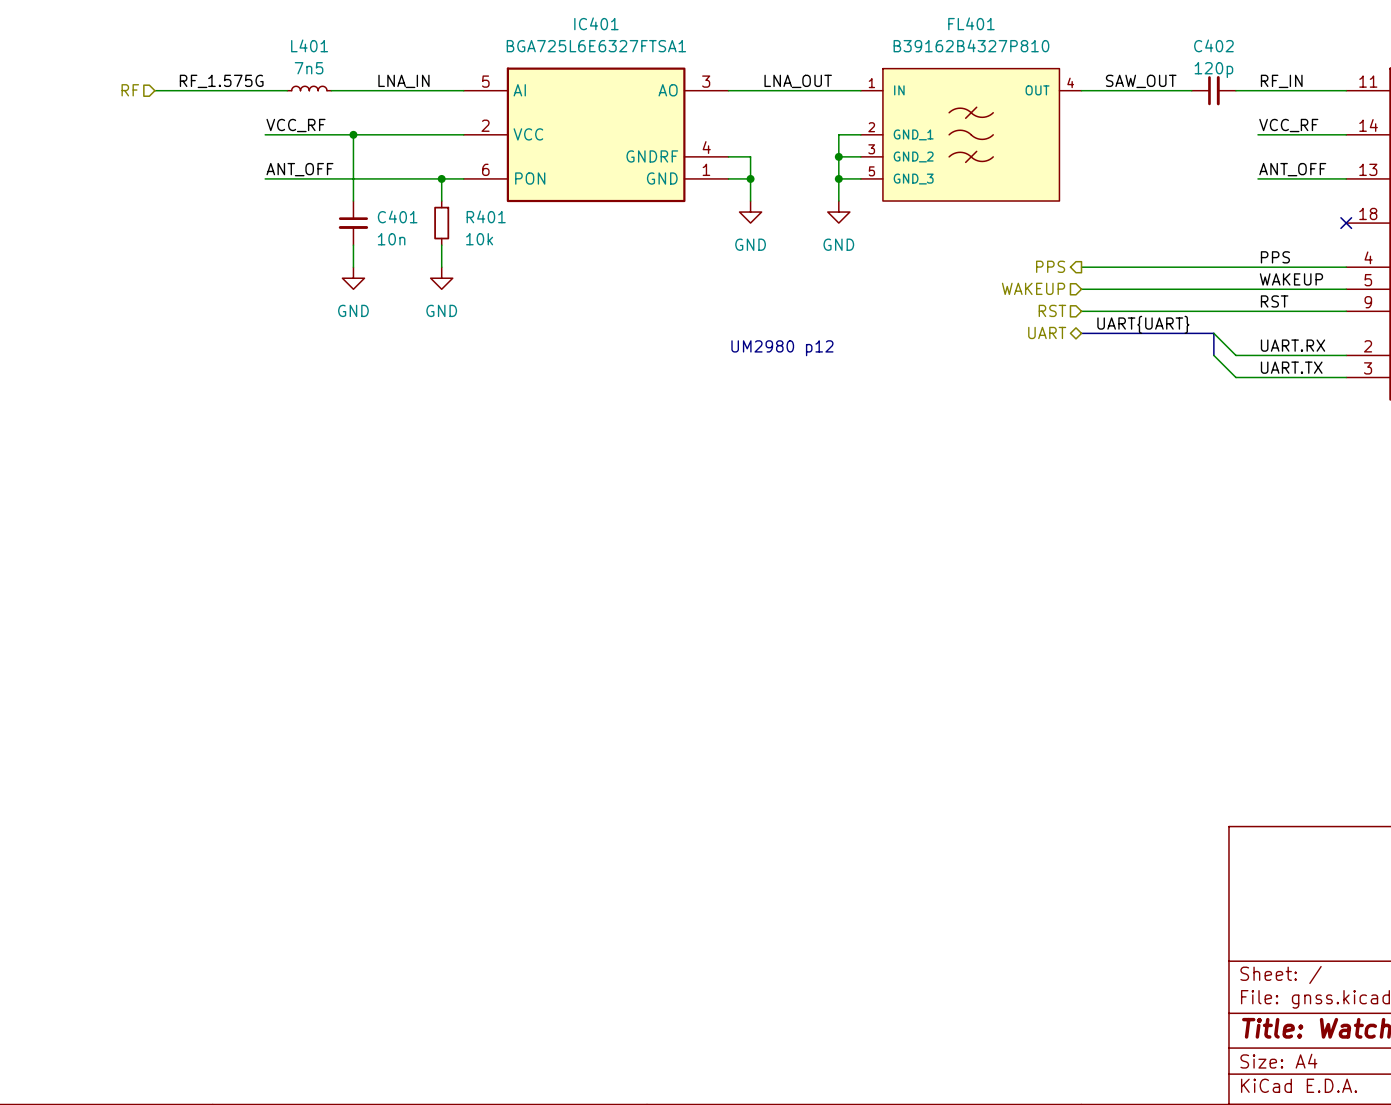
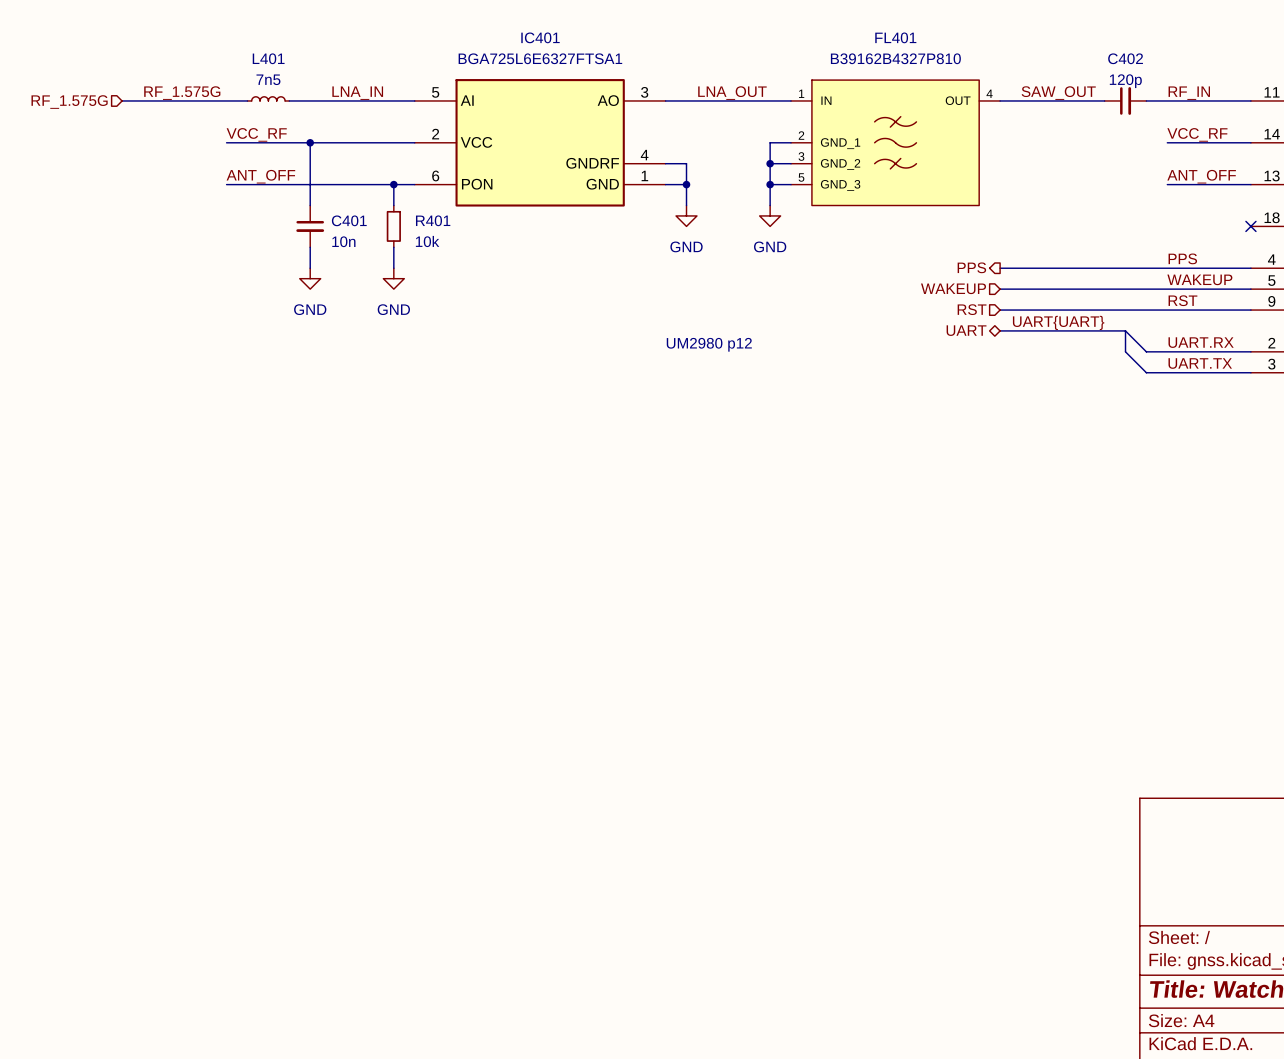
hierarchical label: RF (130, 90) -> RF_1.575G (69, 102)

